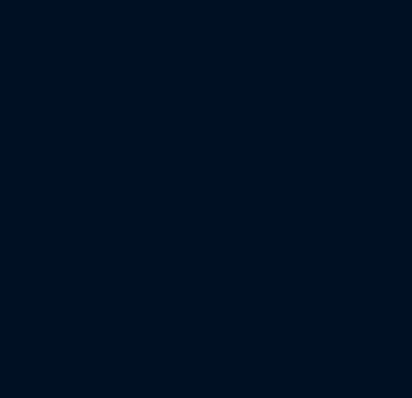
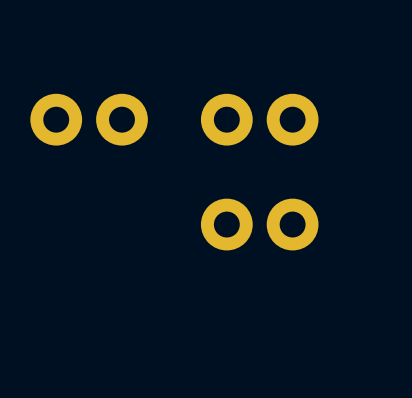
part: none -> (89, 119)
part: none -> (259, 119)
part: none -> (259, 224)

